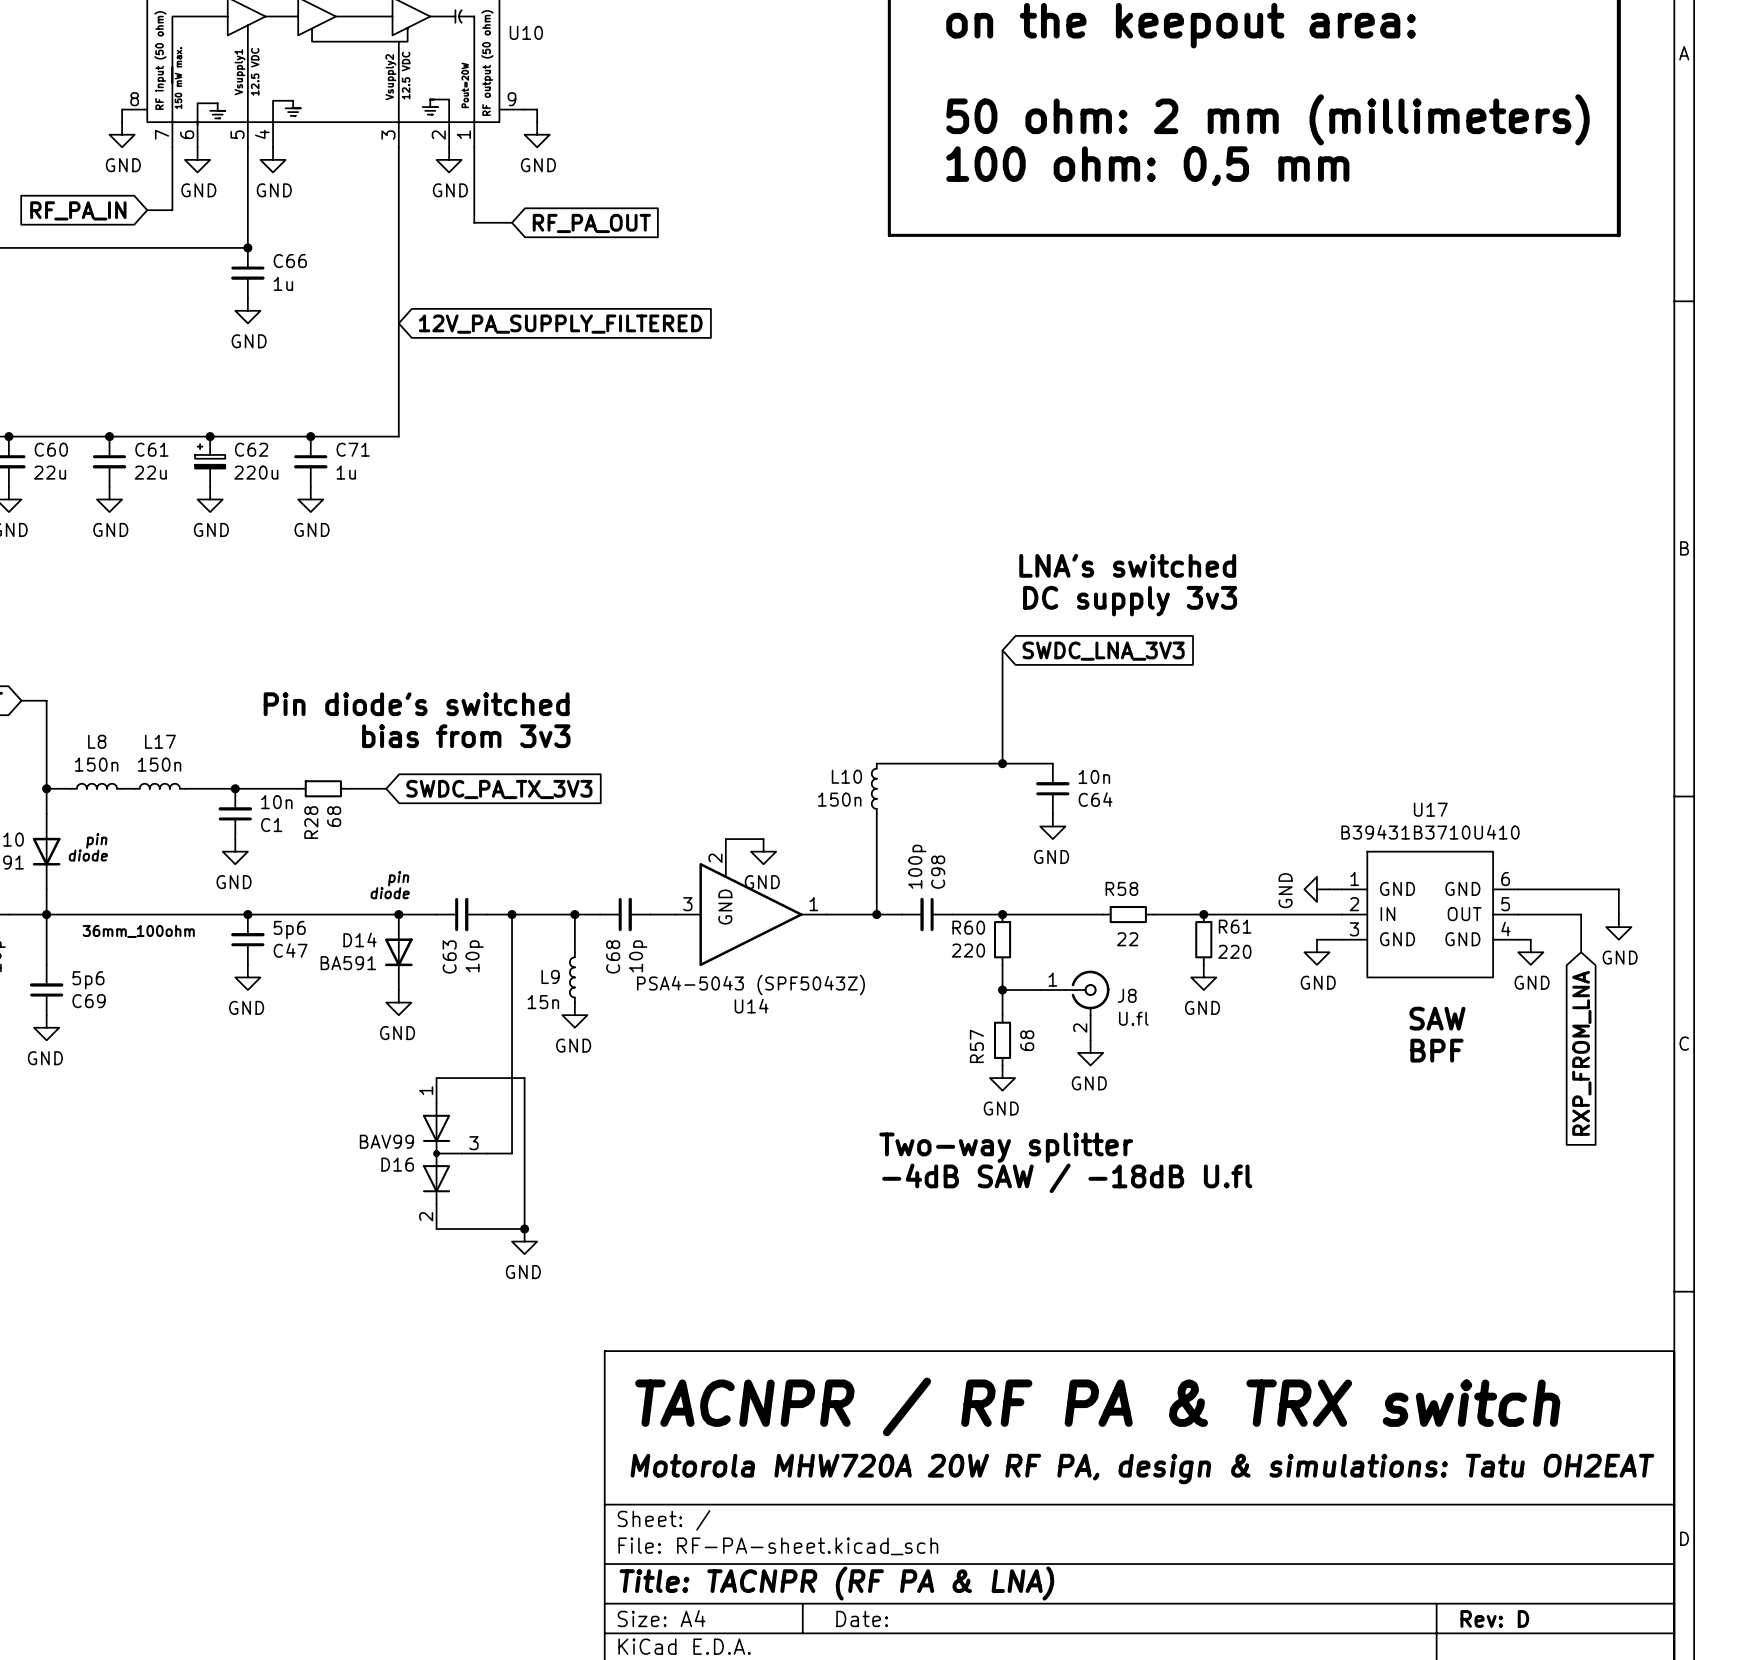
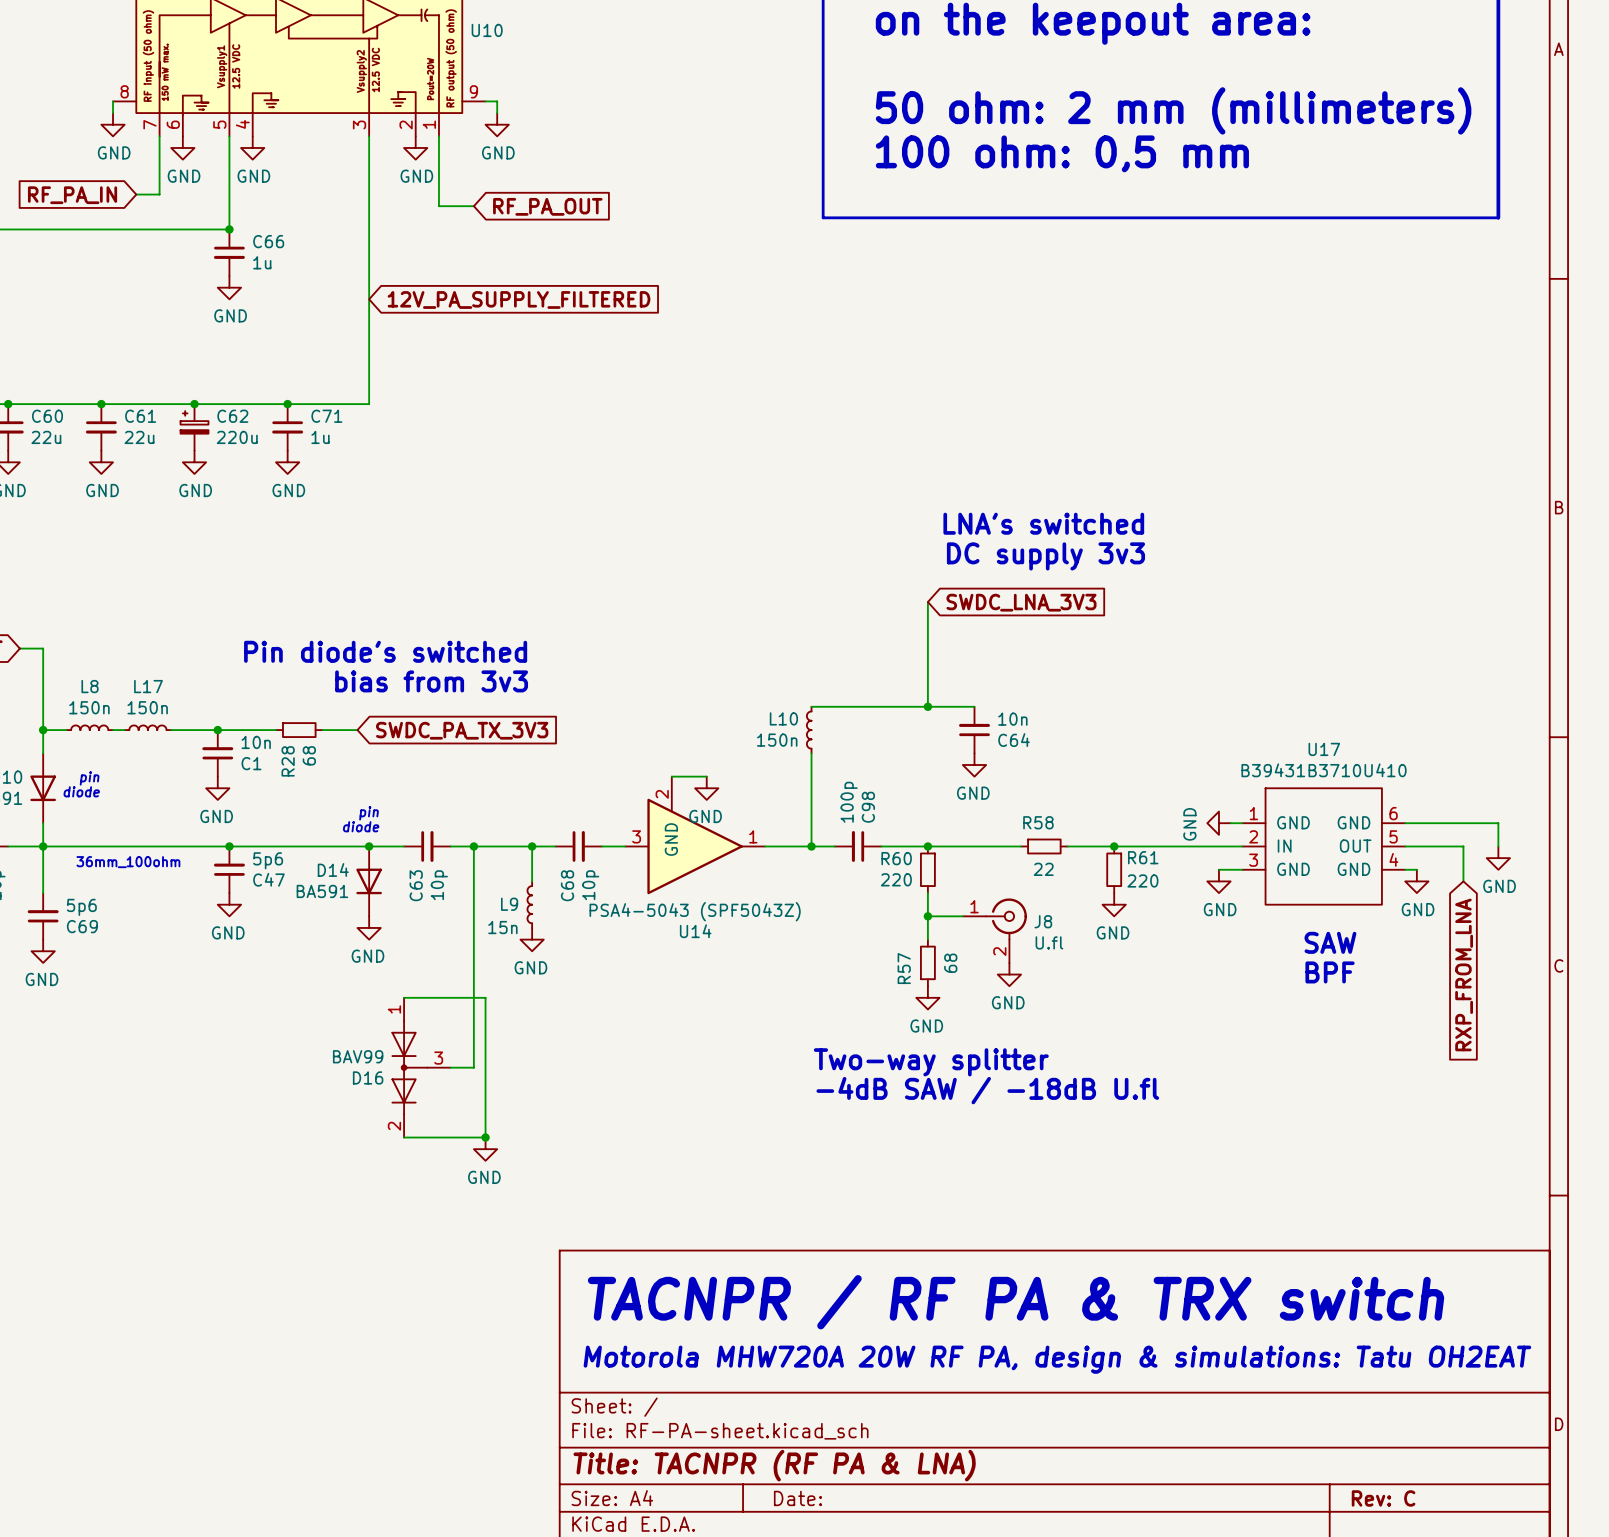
title block: Rev: D (1494, 1618) -> Rev: C (1383, 1498)

